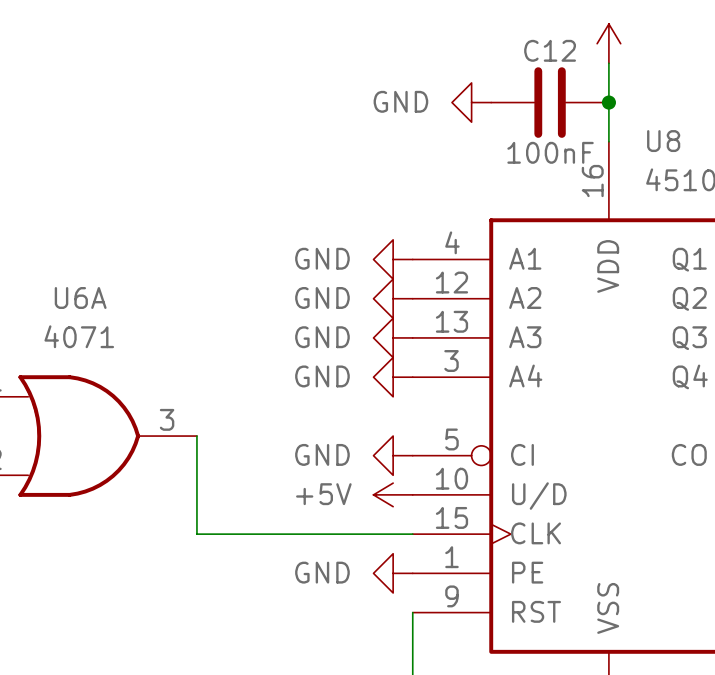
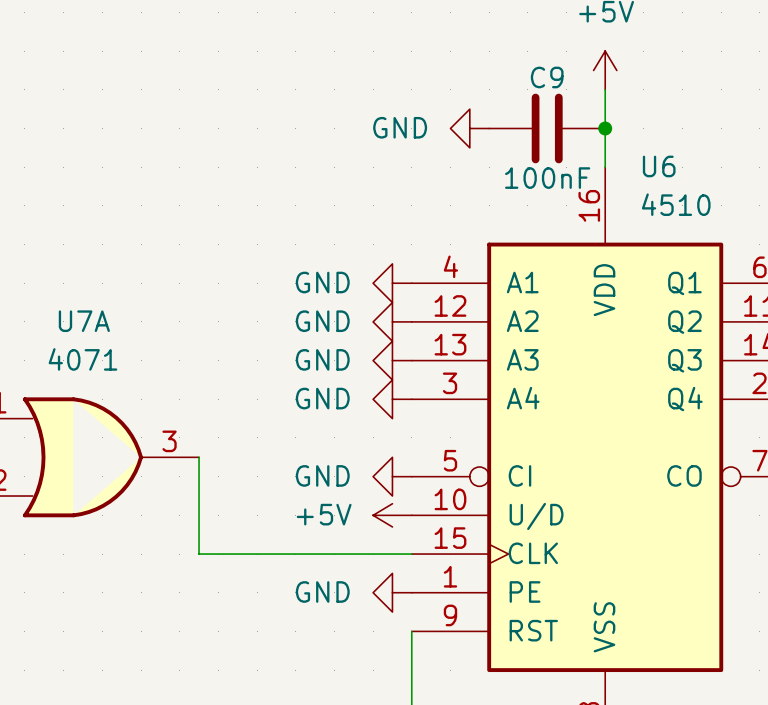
C12 name: C12 (550, 50) -> C9 (547, 77)
U8 name: U8 (663, 141) -> U6 (659, 166)
U6A name: U6A (80, 297) -> U7A (84, 321)

